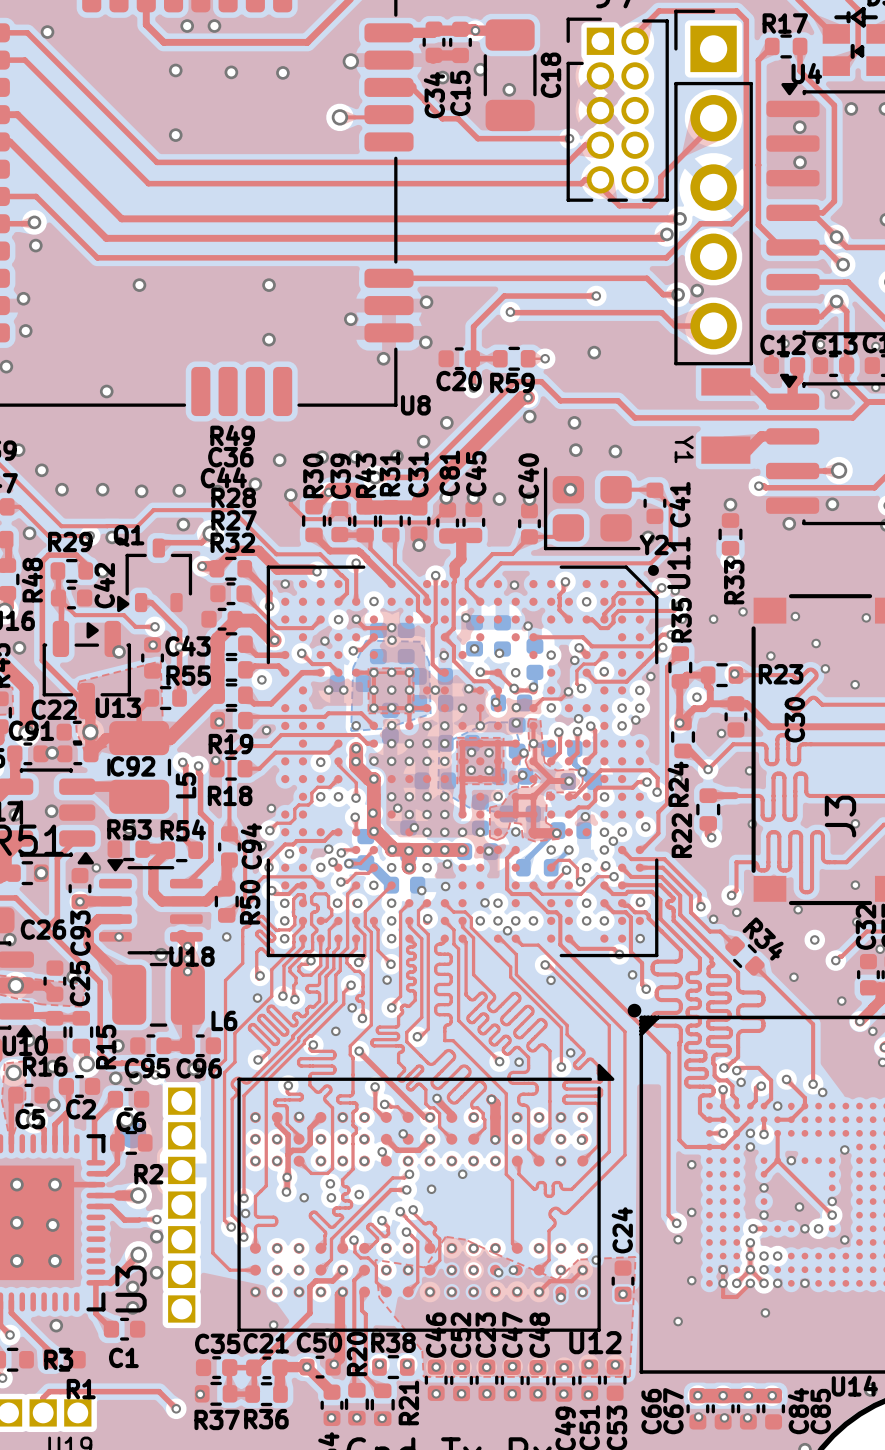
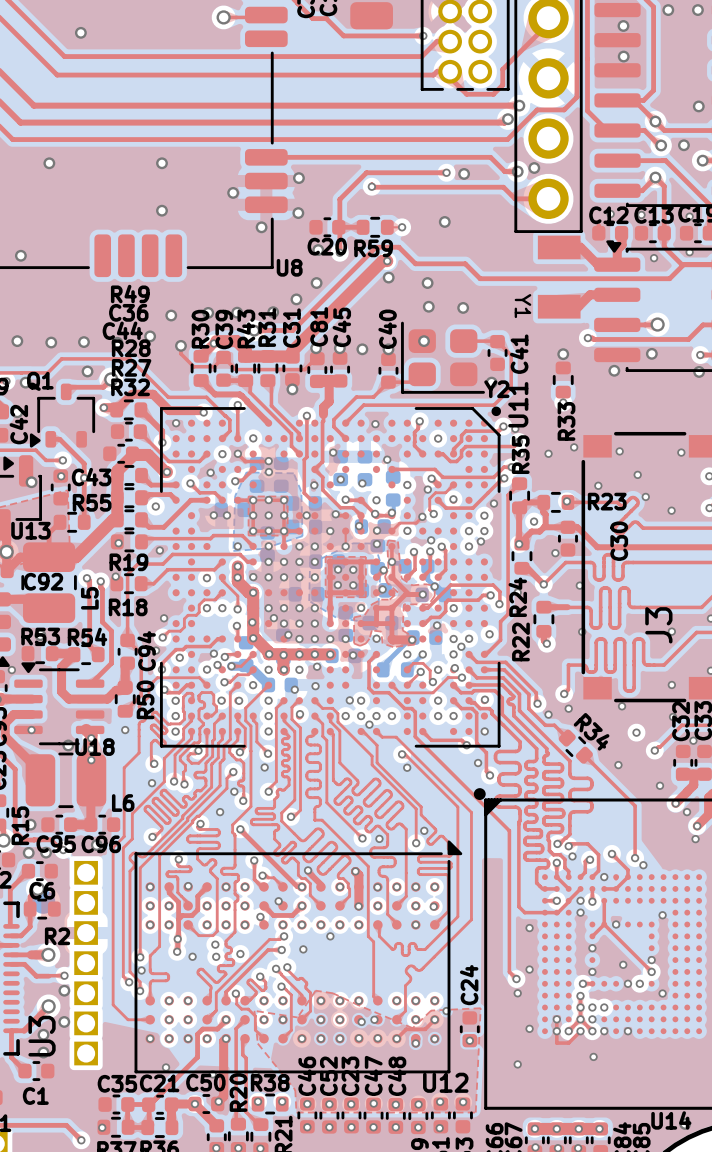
via: none -> (683, 145)
via: none -> (464, 173)
via: none -> (318, 250)

